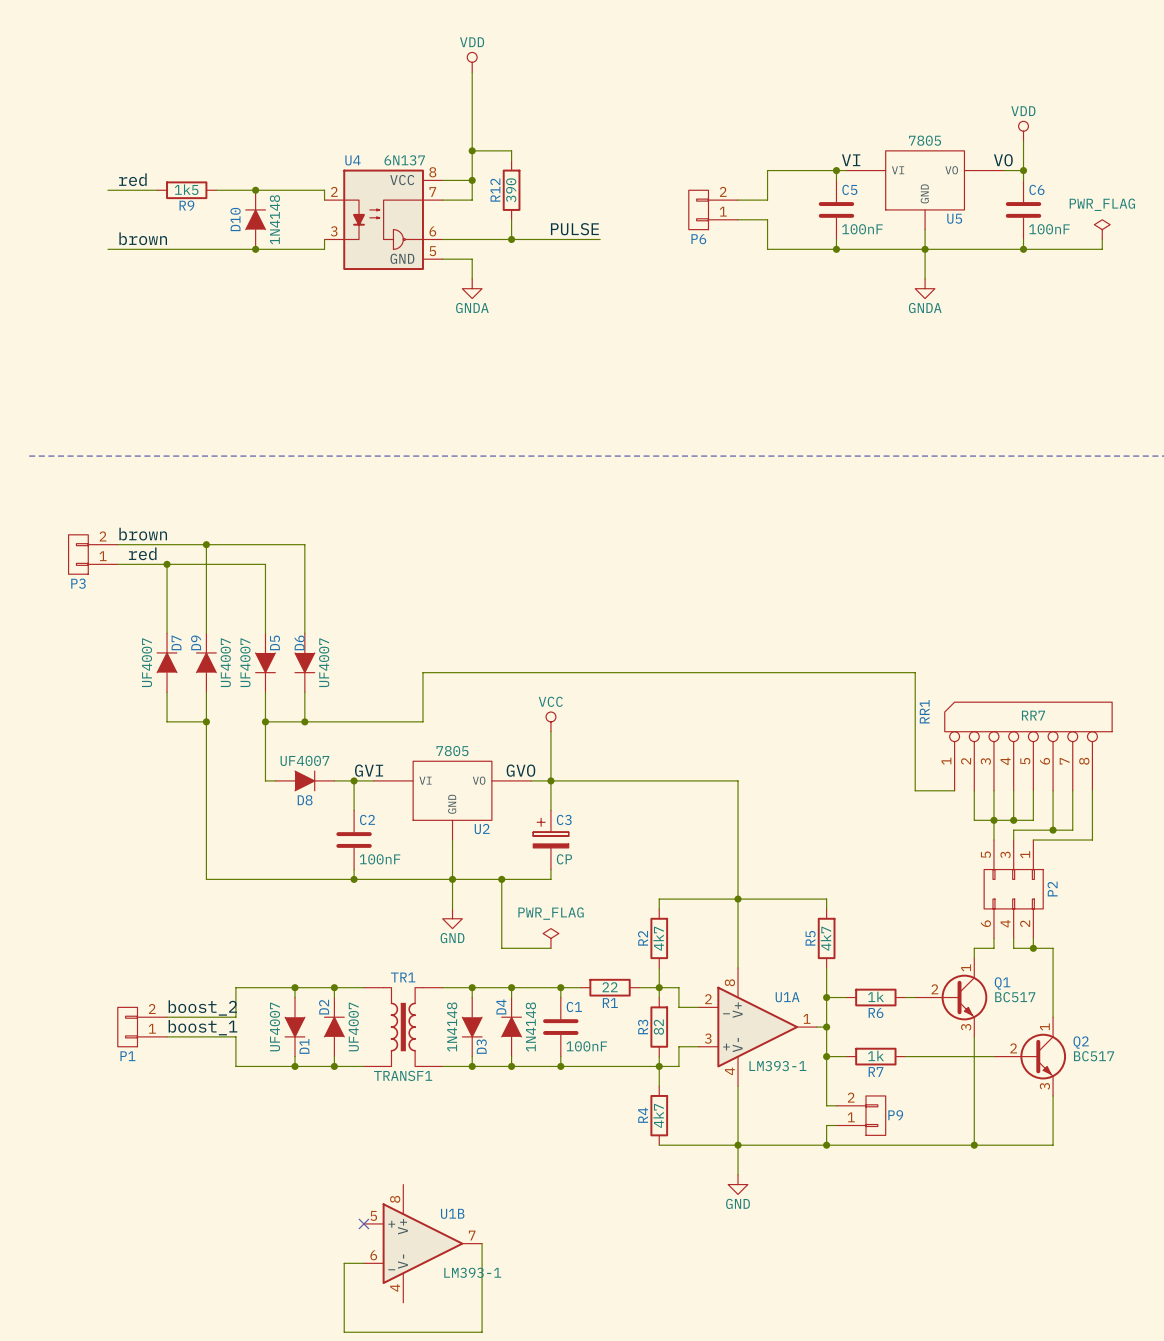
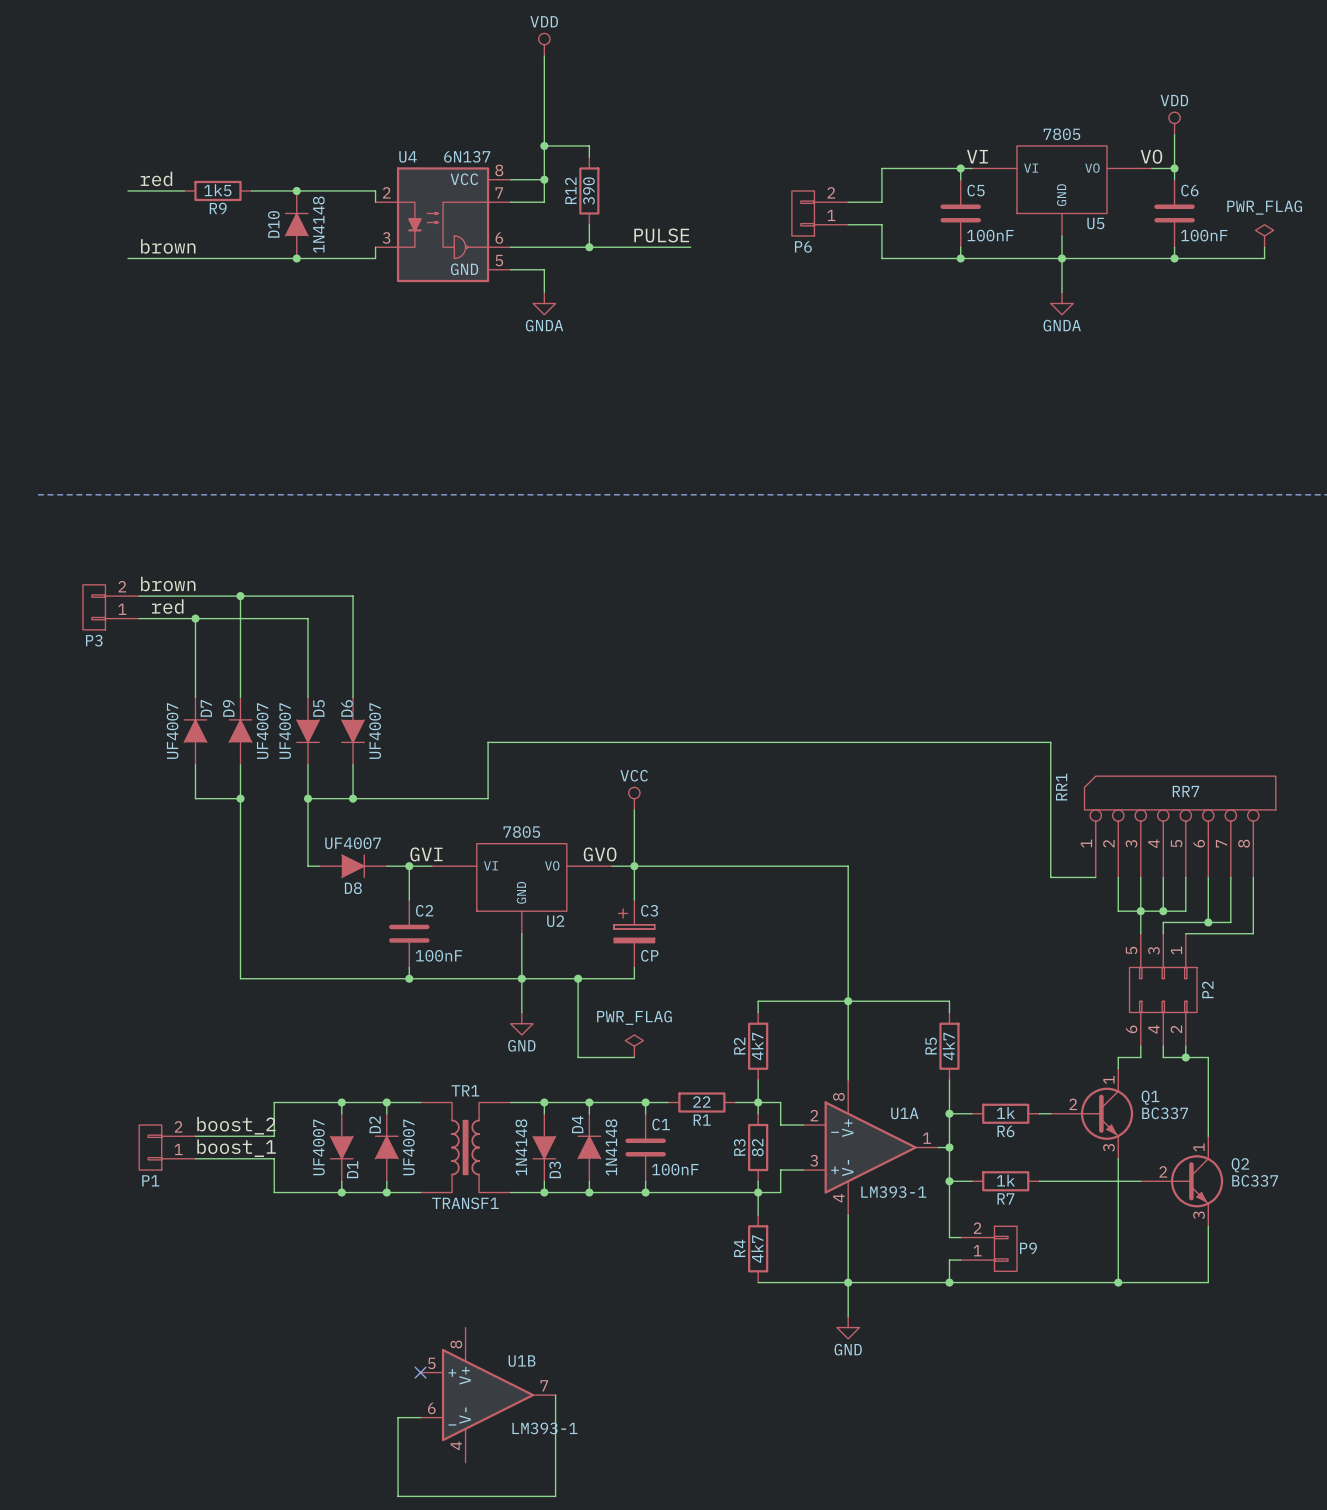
Q1 value: BC517 (1015, 997) -> BC337 (1165, 1113)
Q2 value: BC517 (1094, 1056) -> BC337 (1255, 1180)

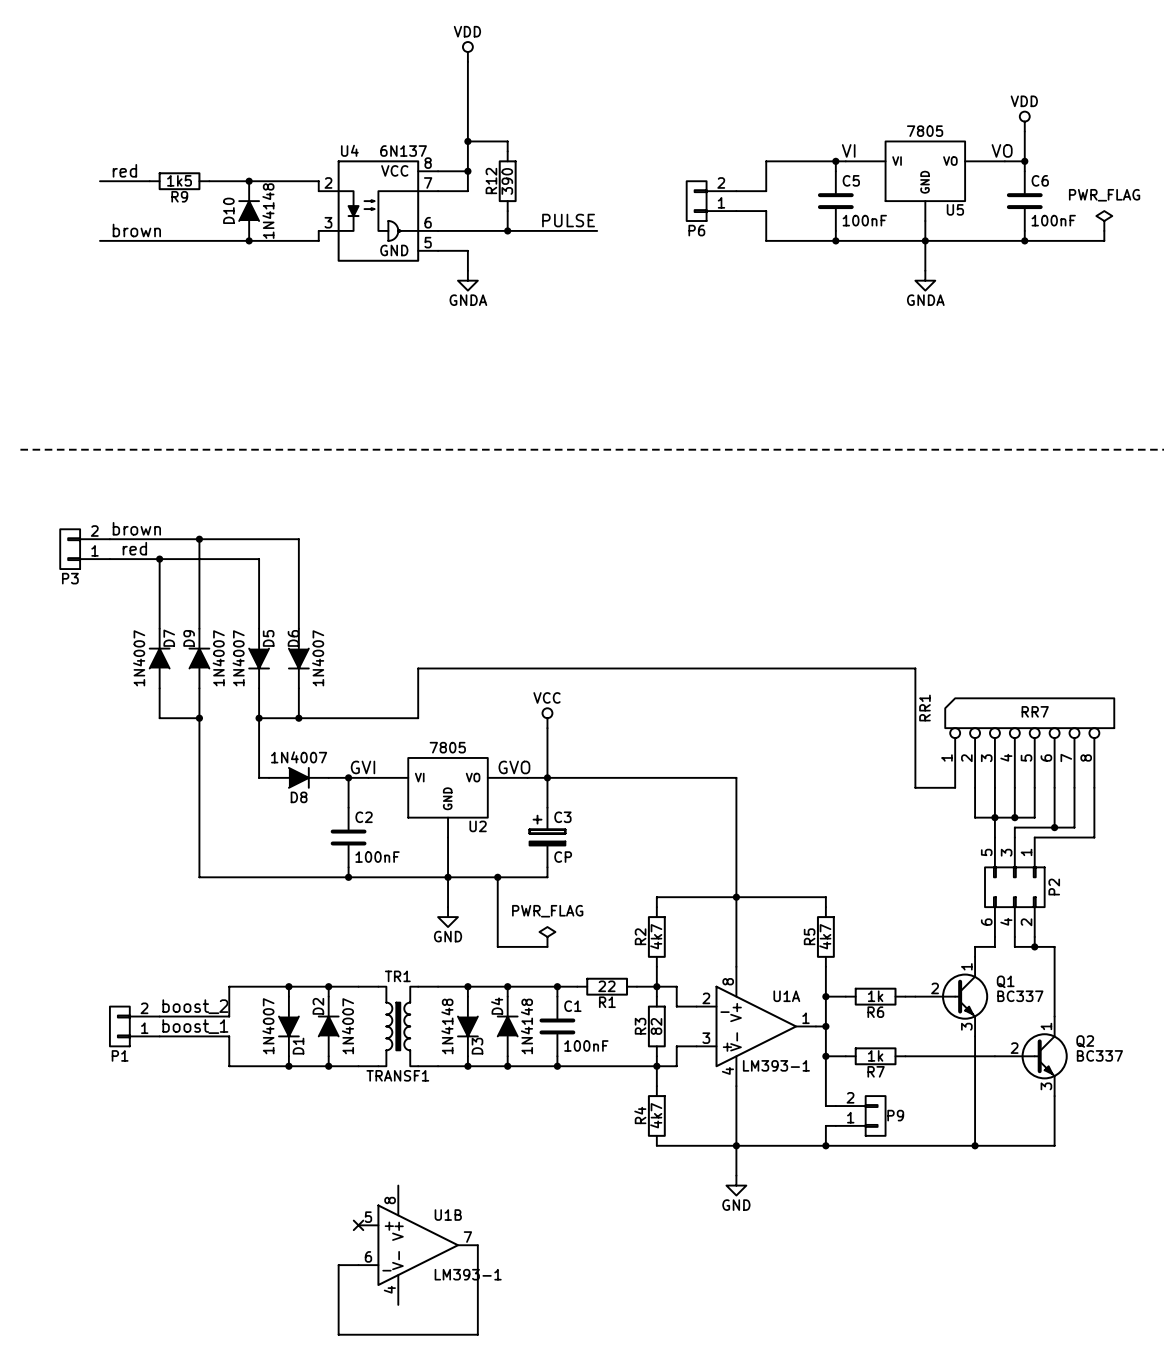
D7 value: UF4007 (172, 731) -> 1N4007 (139, 658)
D9 value: UF4007 (262, 731) -> 1N4007 (218, 658)
D5 value: UF4007 (285, 731) -> 1N4007 (238, 658)
D6 value: UF4007 (375, 731) -> 1N4007 (318, 658)
D8 value: UF4007 (353, 843) -> 1N4007 (299, 757)
D1 value: UF4007 (318, 1147) -> 1N4007 (268, 1026)
D2 value: UF4007 (408, 1147) -> 1N4007 (347, 1026)

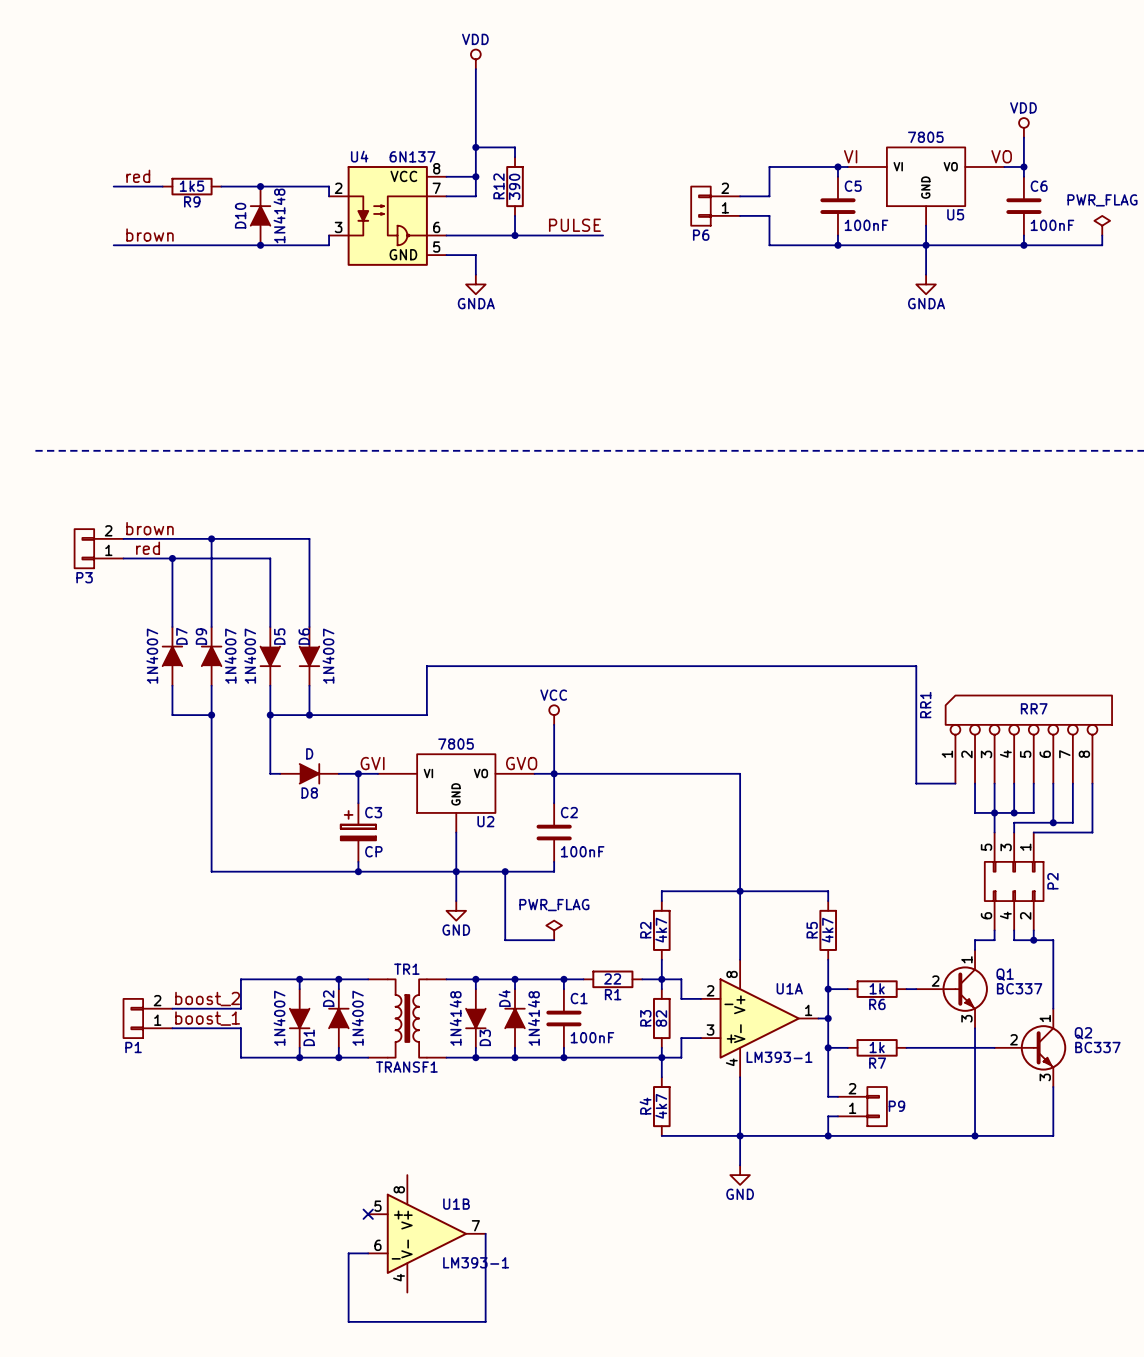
D8 value: 1N4007 (299, 757) -> D (309, 753)
C2 position: (348, 837) -> (554, 832)
C3 position: (547, 837) -> (358, 832)

